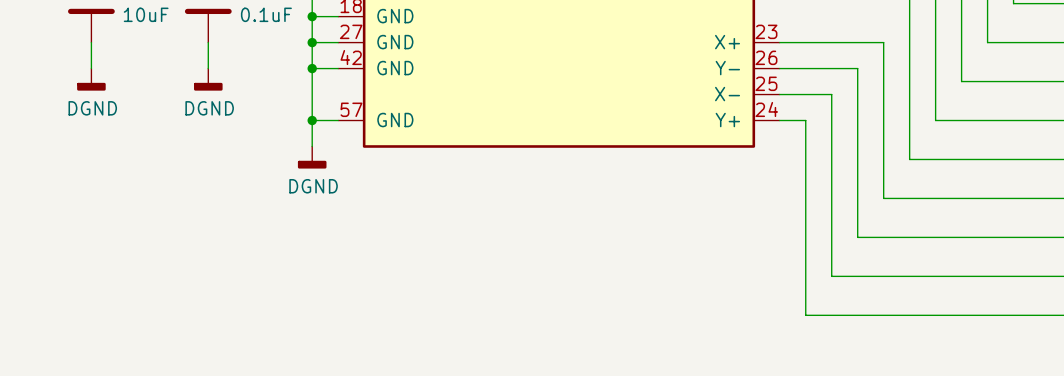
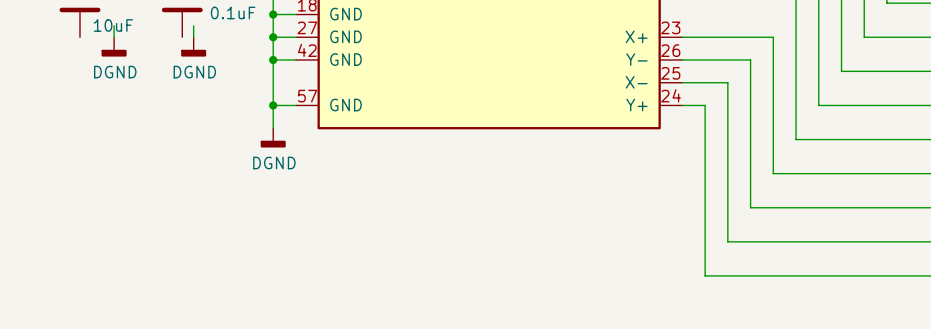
part value position: 10uF (146, 14) -> 10uF (113, 25)
wire: none -> (114, 25) (114, 37)
wire: none -> (193, 25) (193, 37)
wire: (91, 42) (91, 68) -> none
wire: (208, 42) (208, 68) -> none
power symbol: none -> DGND (114, 46)
power symbol: DGND (91, 79) -> none
power symbol position: DGND (208, 79) -> DGND (193, 46)

